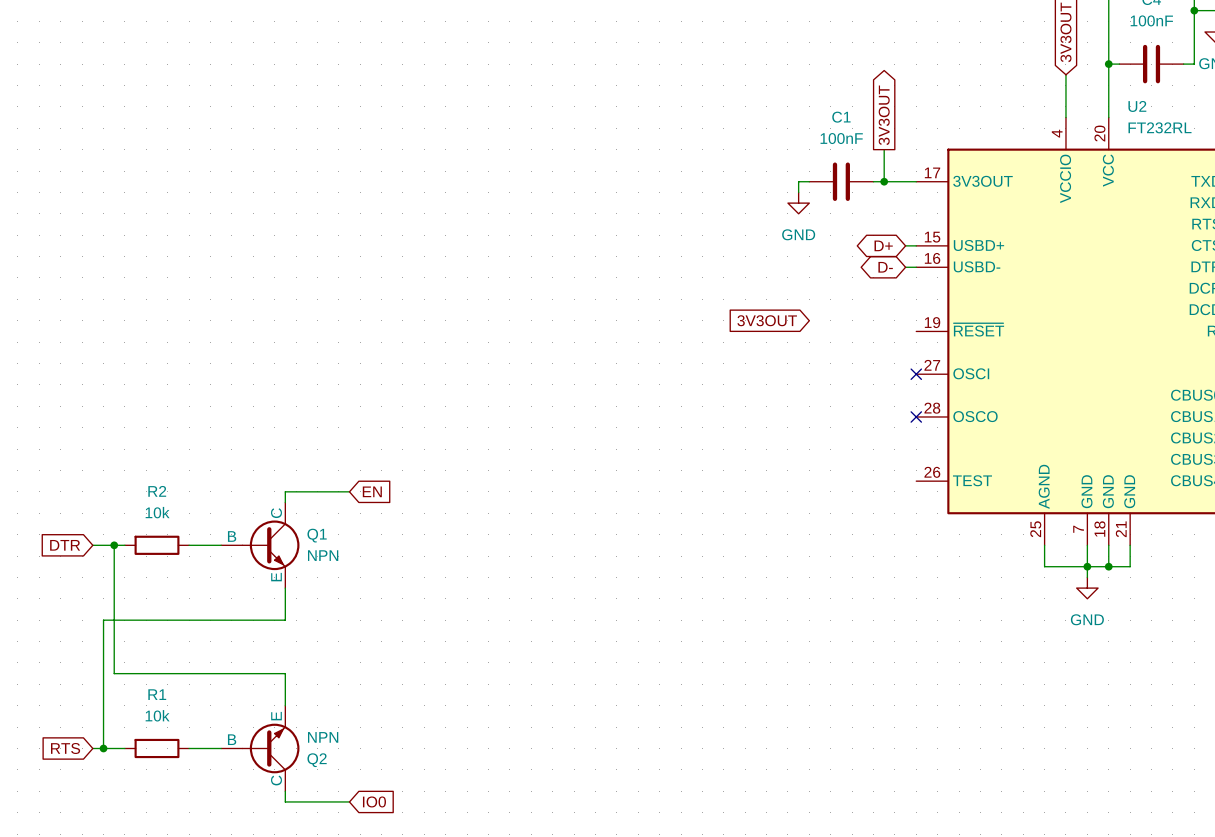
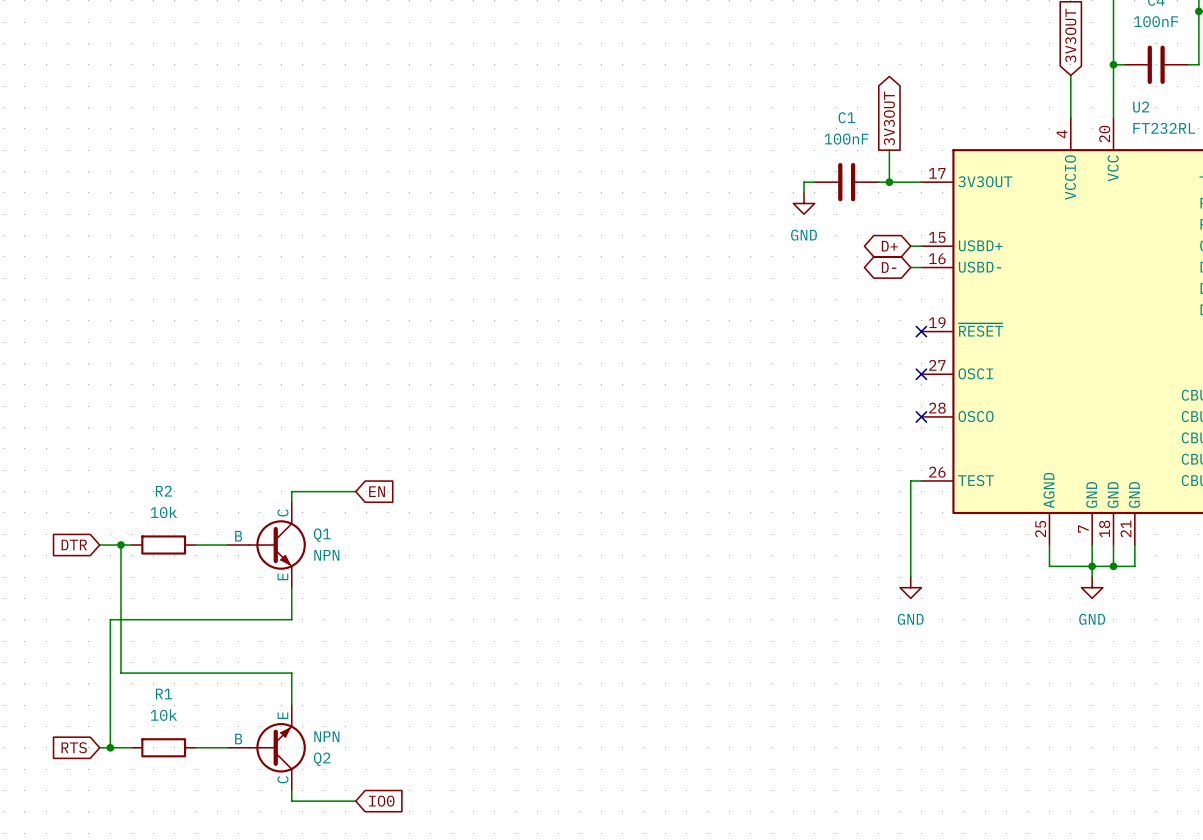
global label: 3V3OUT (767, 320) -> none
no-connect mark: none -> (921, 331)
wire: none -> (921, 480) (910, 480) (910, 577)
power symbol: none -> GND (910, 587)

